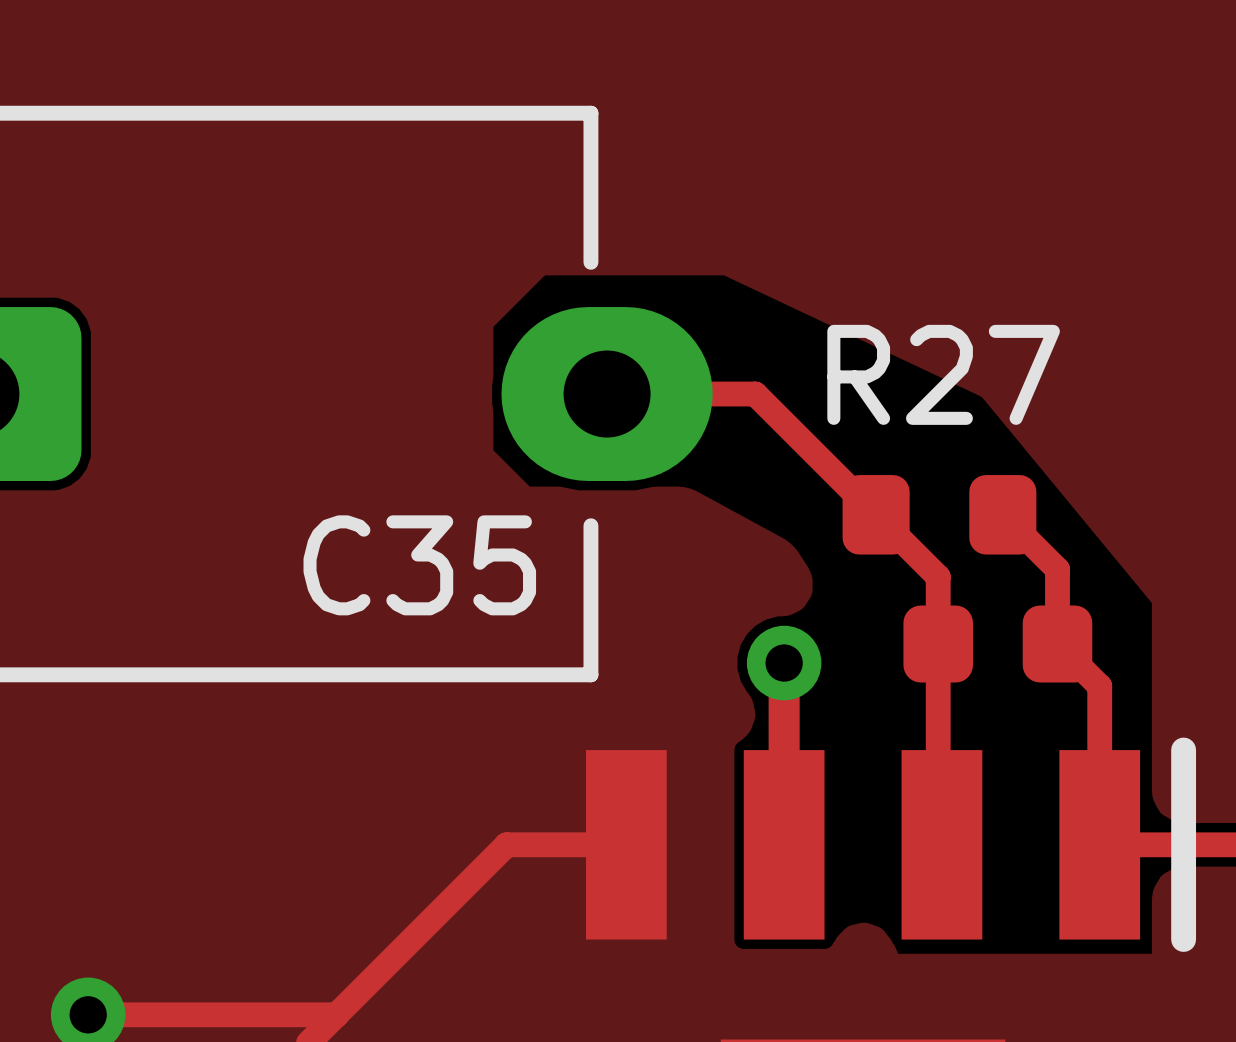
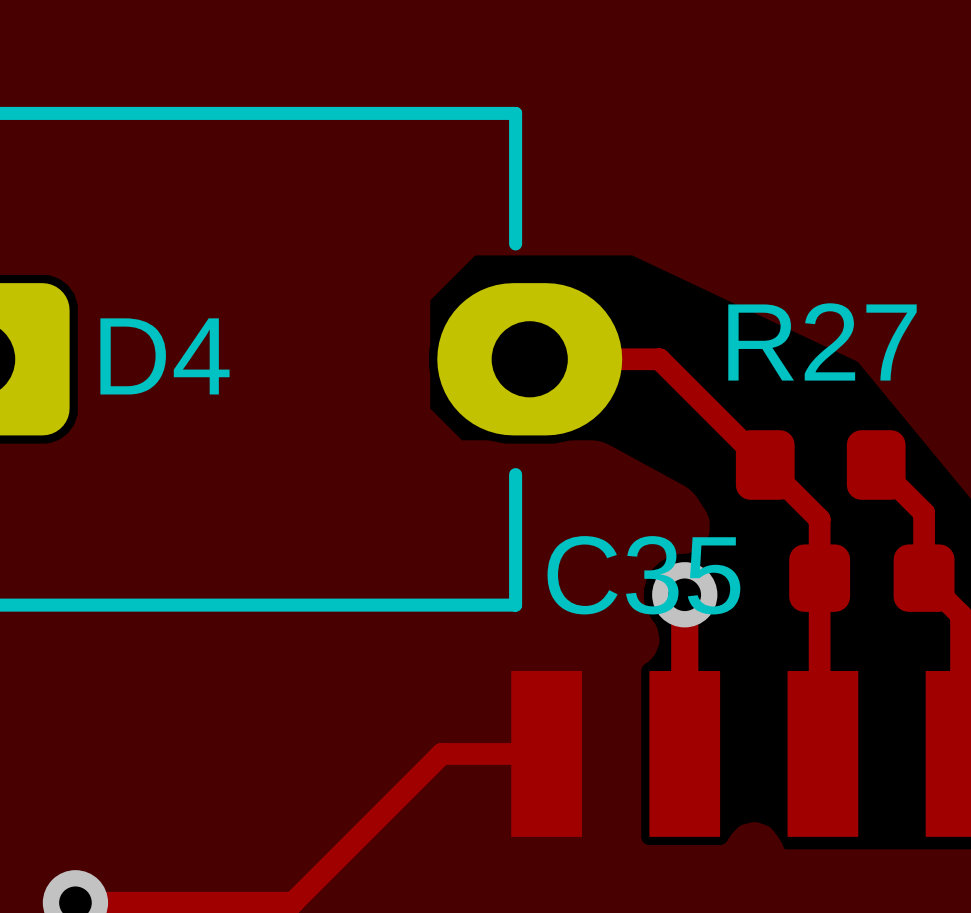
D4 name: none -> D4 (164, 356)
C35 name position: C35 (419, 565) -> C35 (643, 575)

